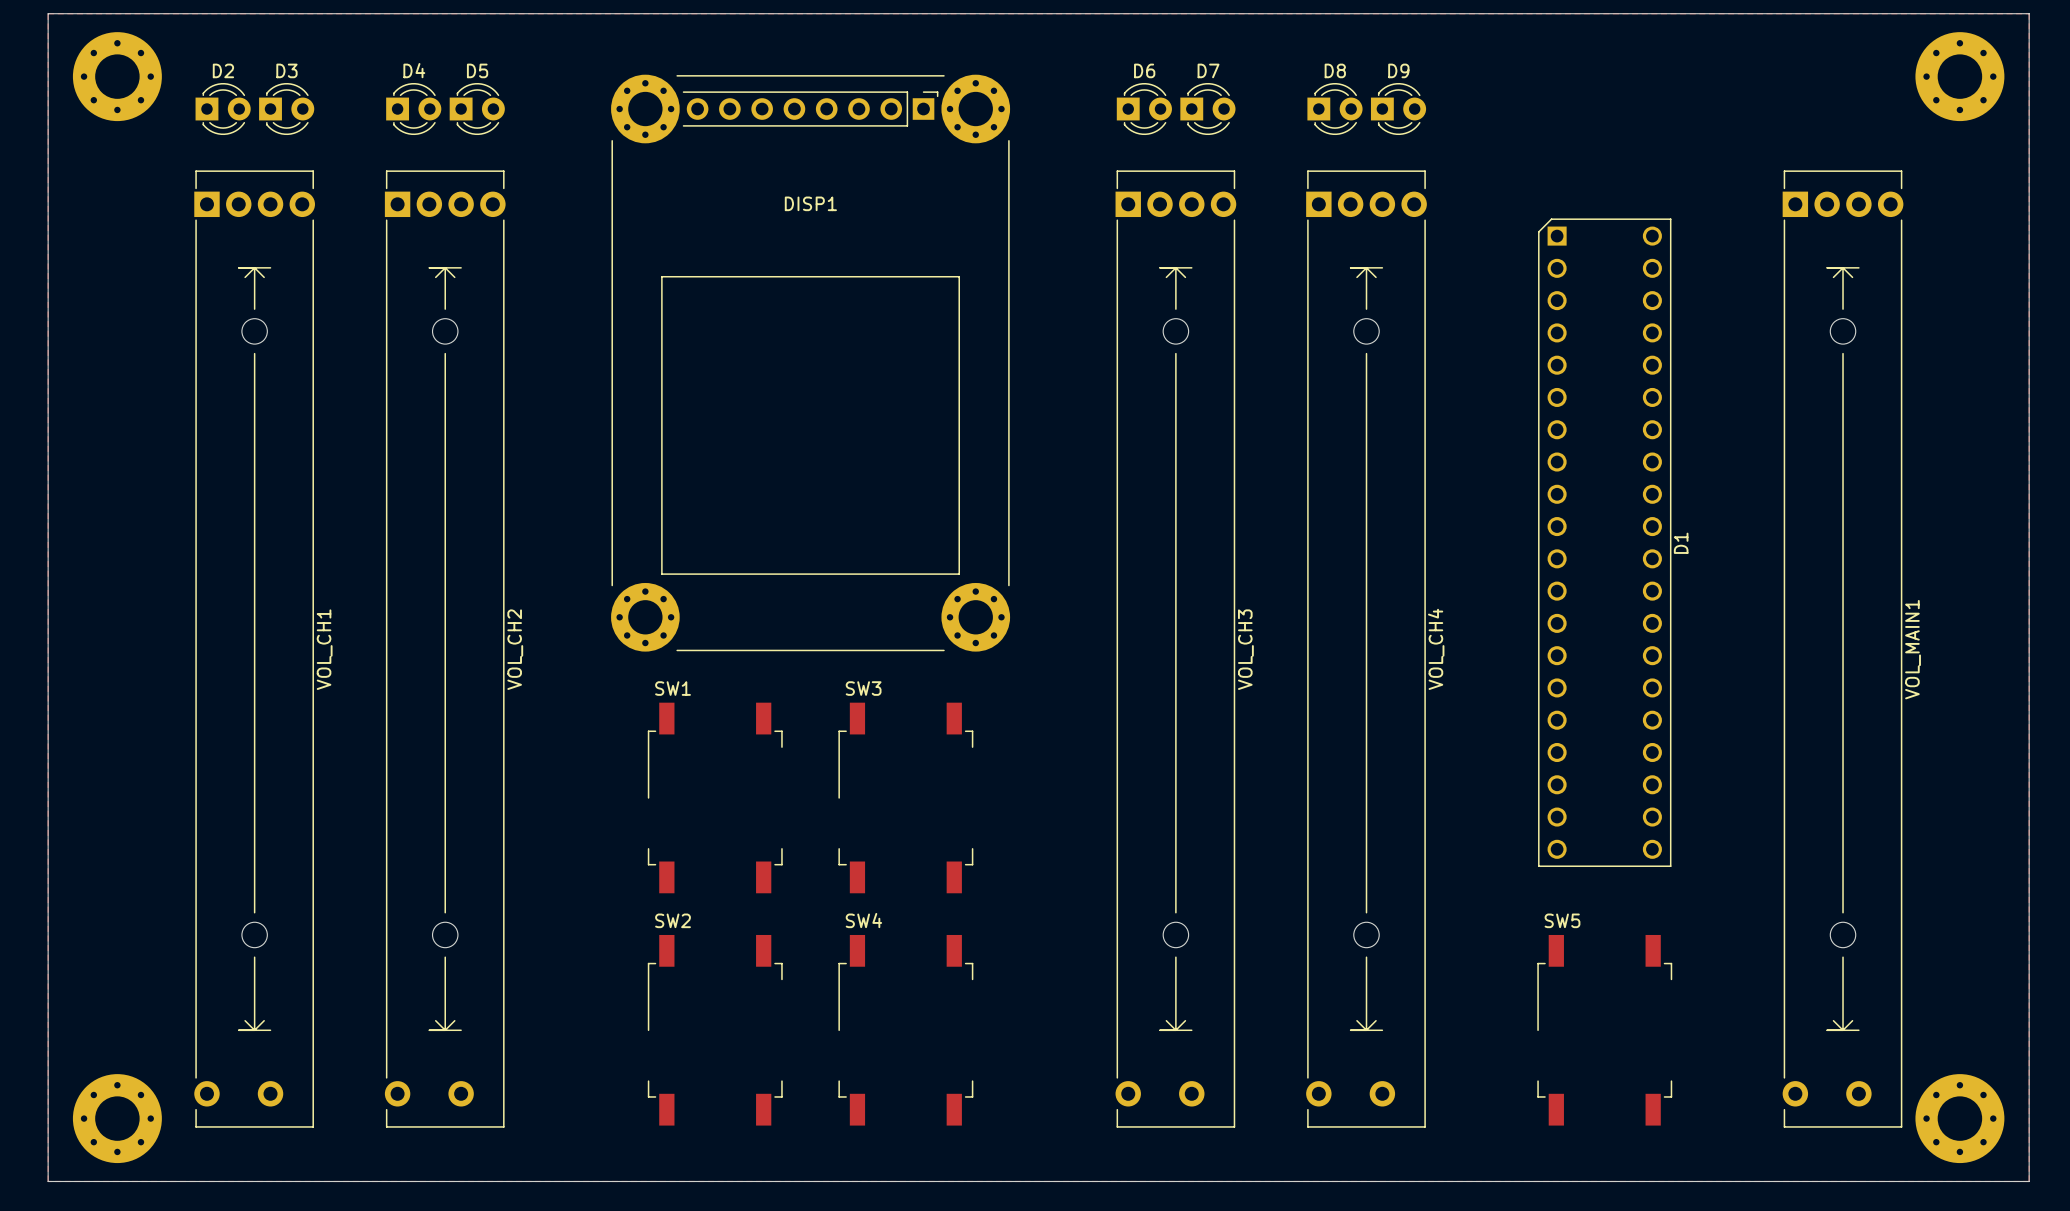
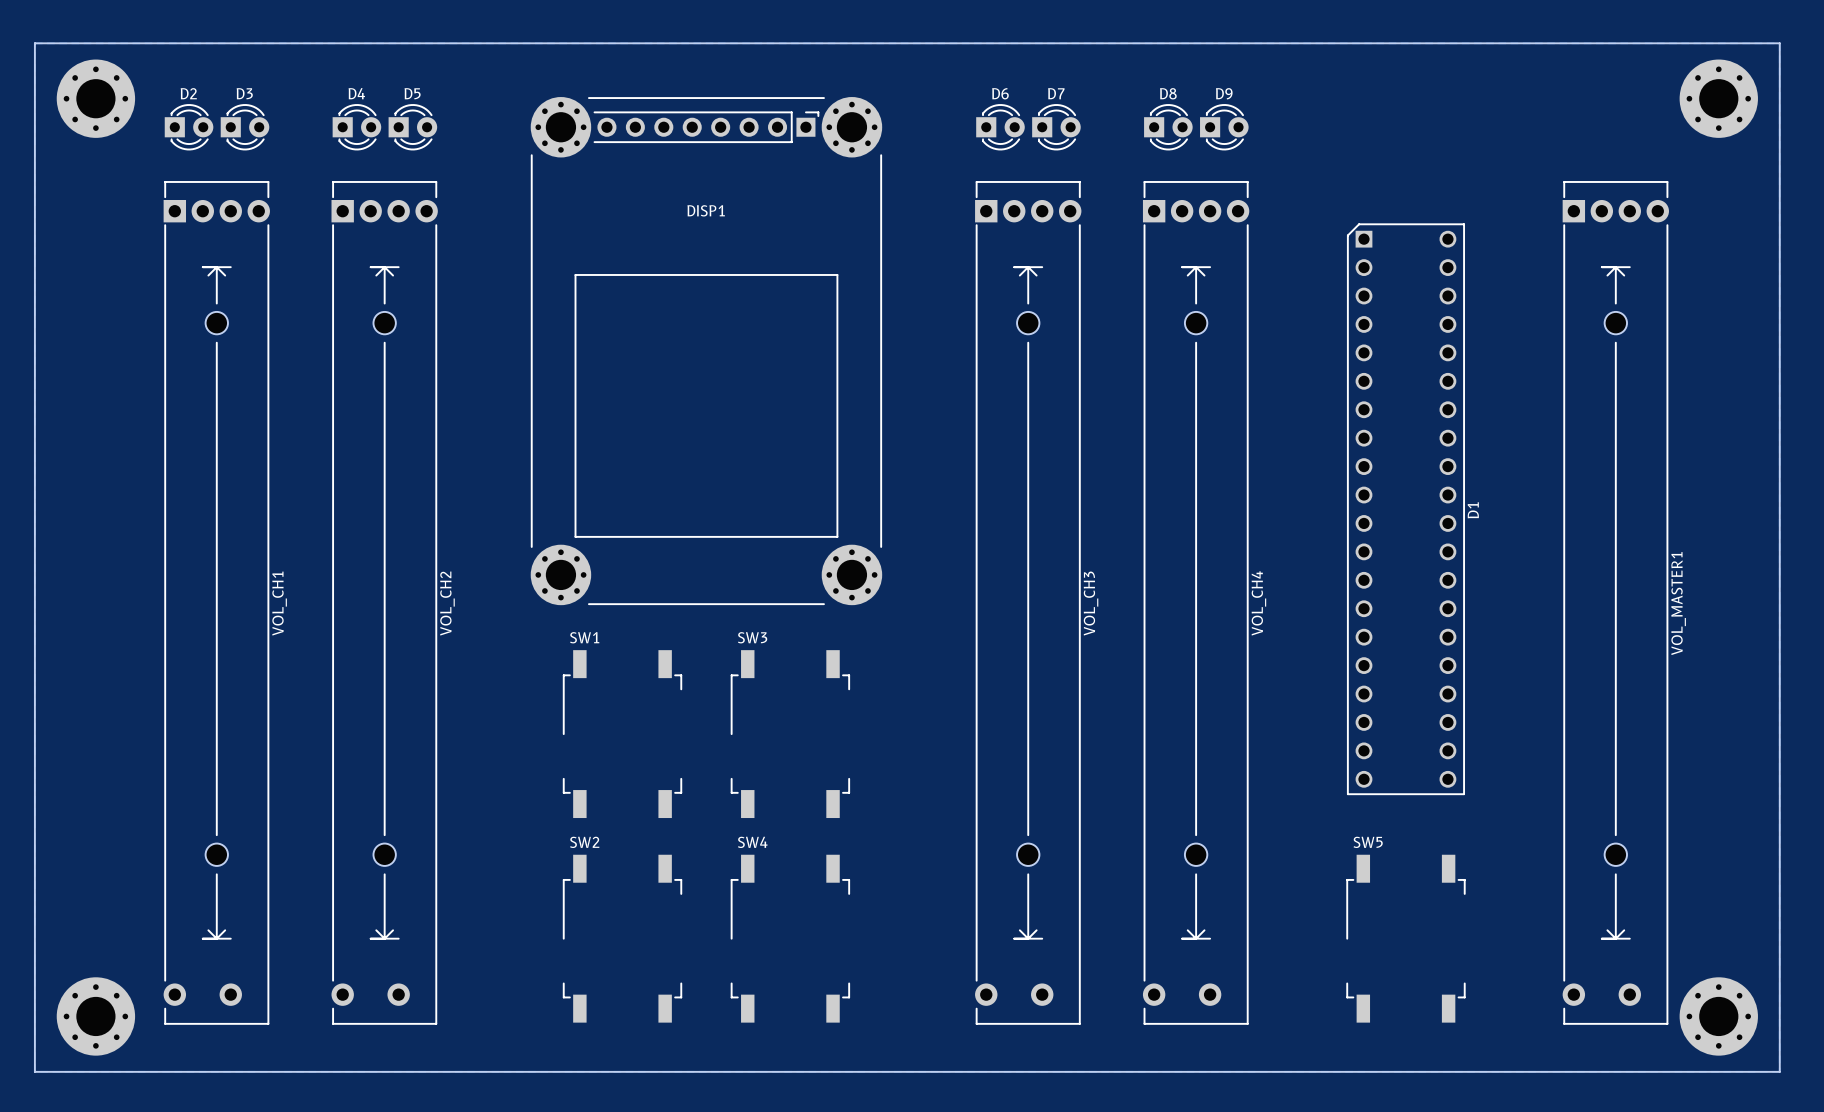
VOL_MAIN1 name: VOL_MAIN1 (1913, 649) -> VOL_MASTER1 (1678, 603)

